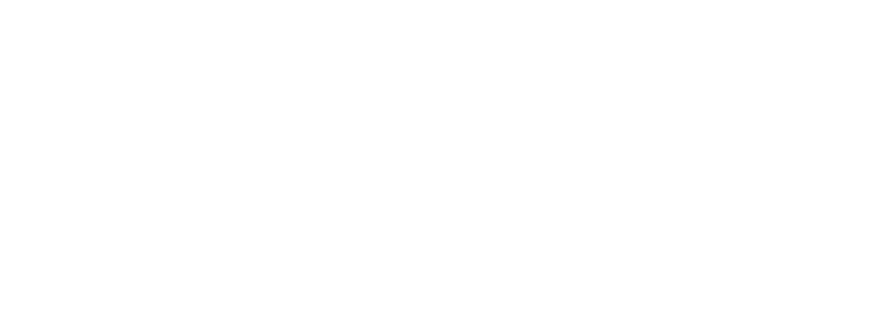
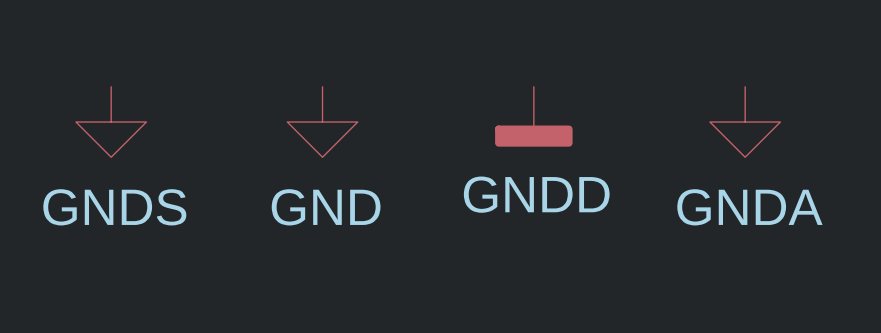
power symbol: none -> GNDD (533, 116)
power symbol: none -> GNDS (111, 122)
power symbol: none -> GND (322, 122)
power symbol: none -> GNDA (745, 122)

